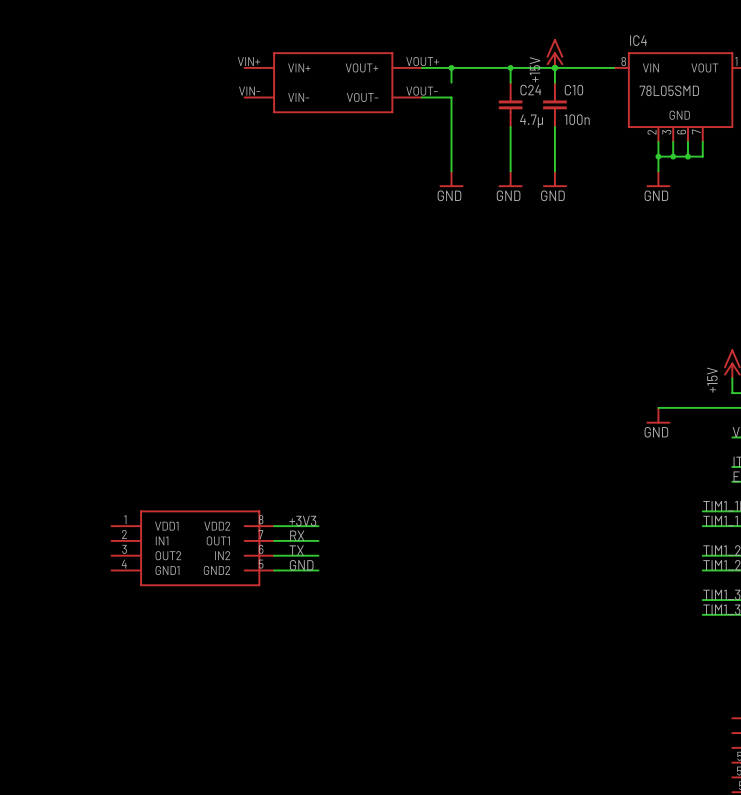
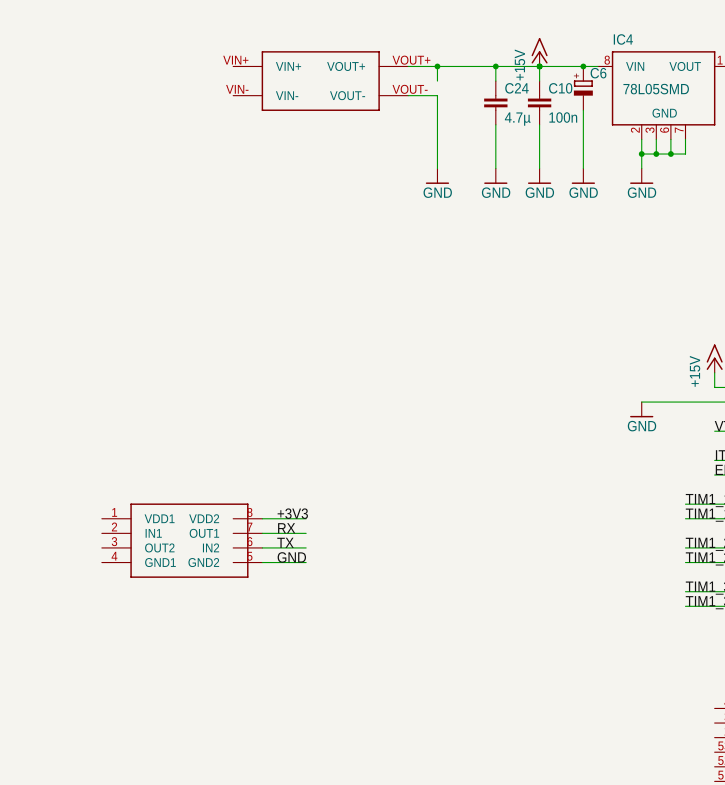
junction: none -> (583, 66)
C6: none -> (583, 88)
wire: none -> (583, 110) (583, 168)
power symbol: none -> GND (583, 176)

